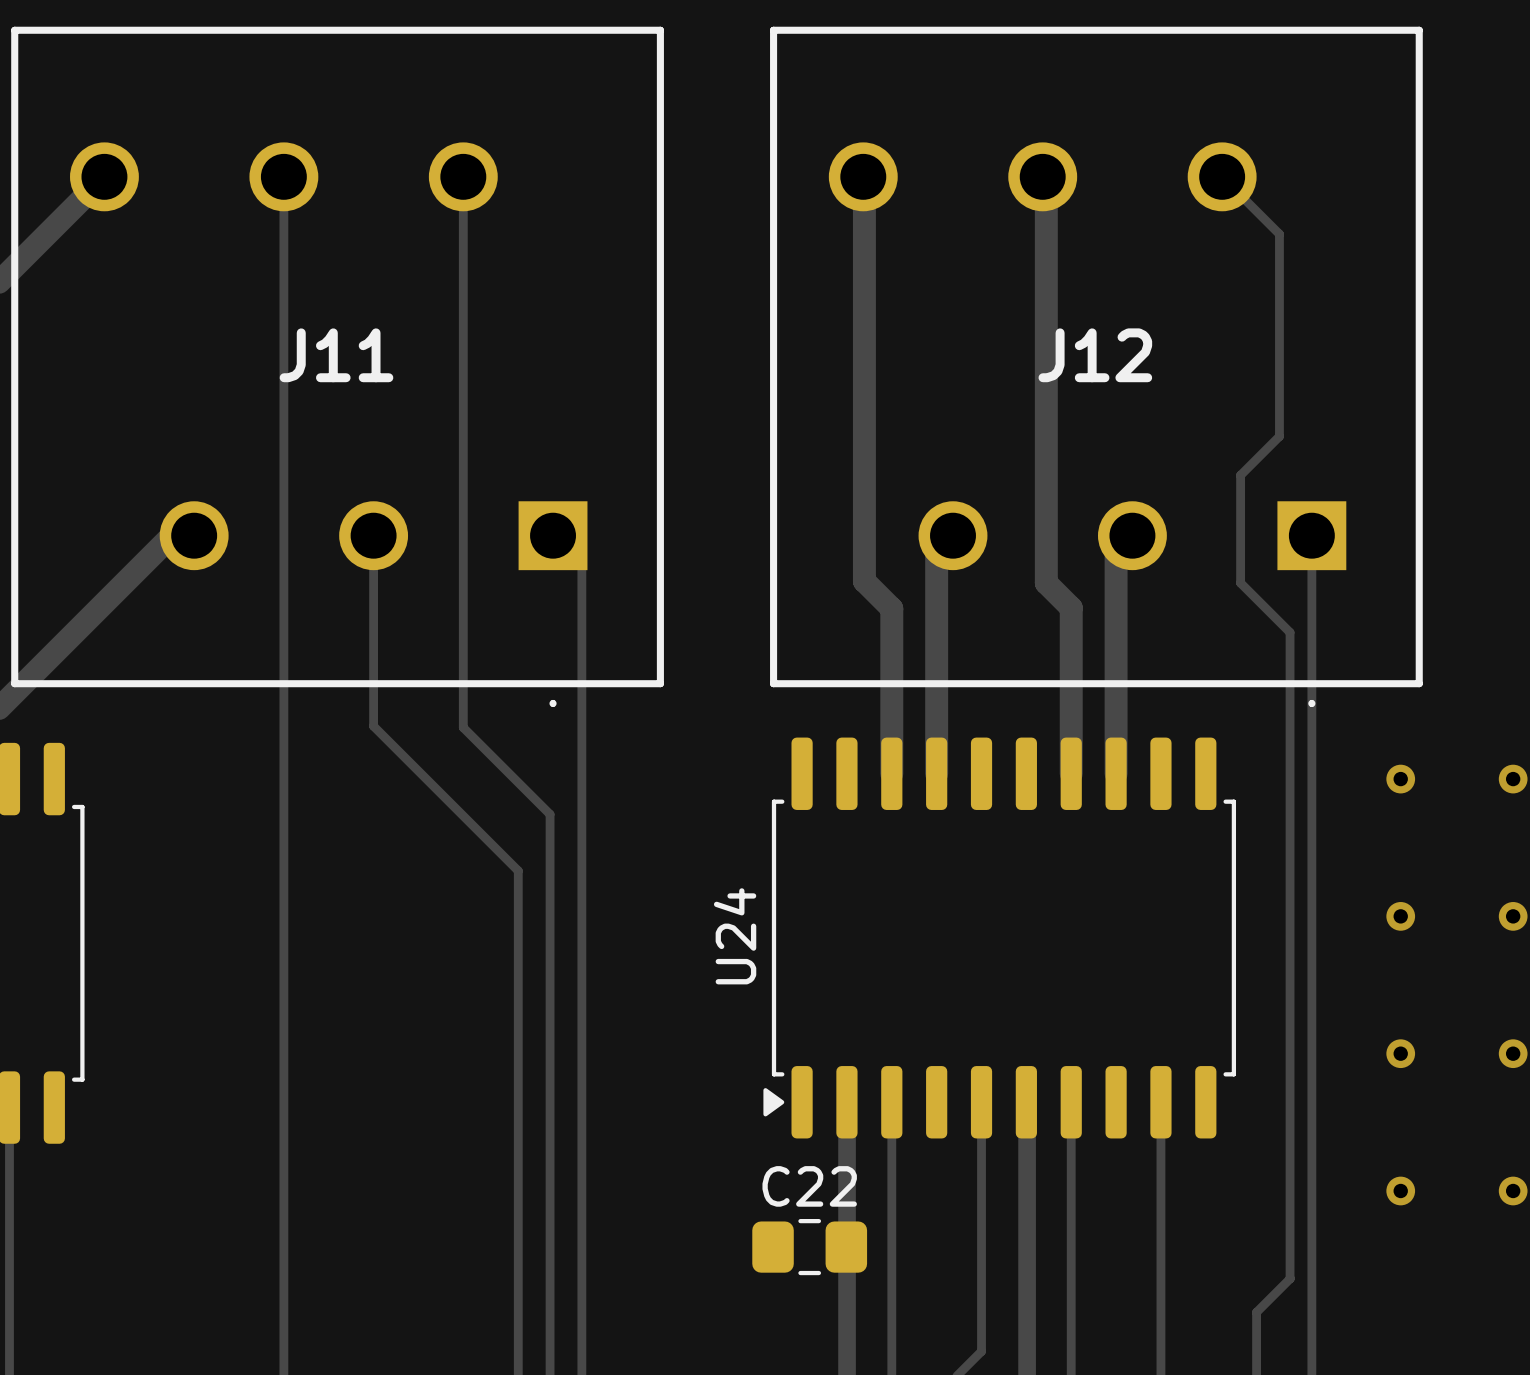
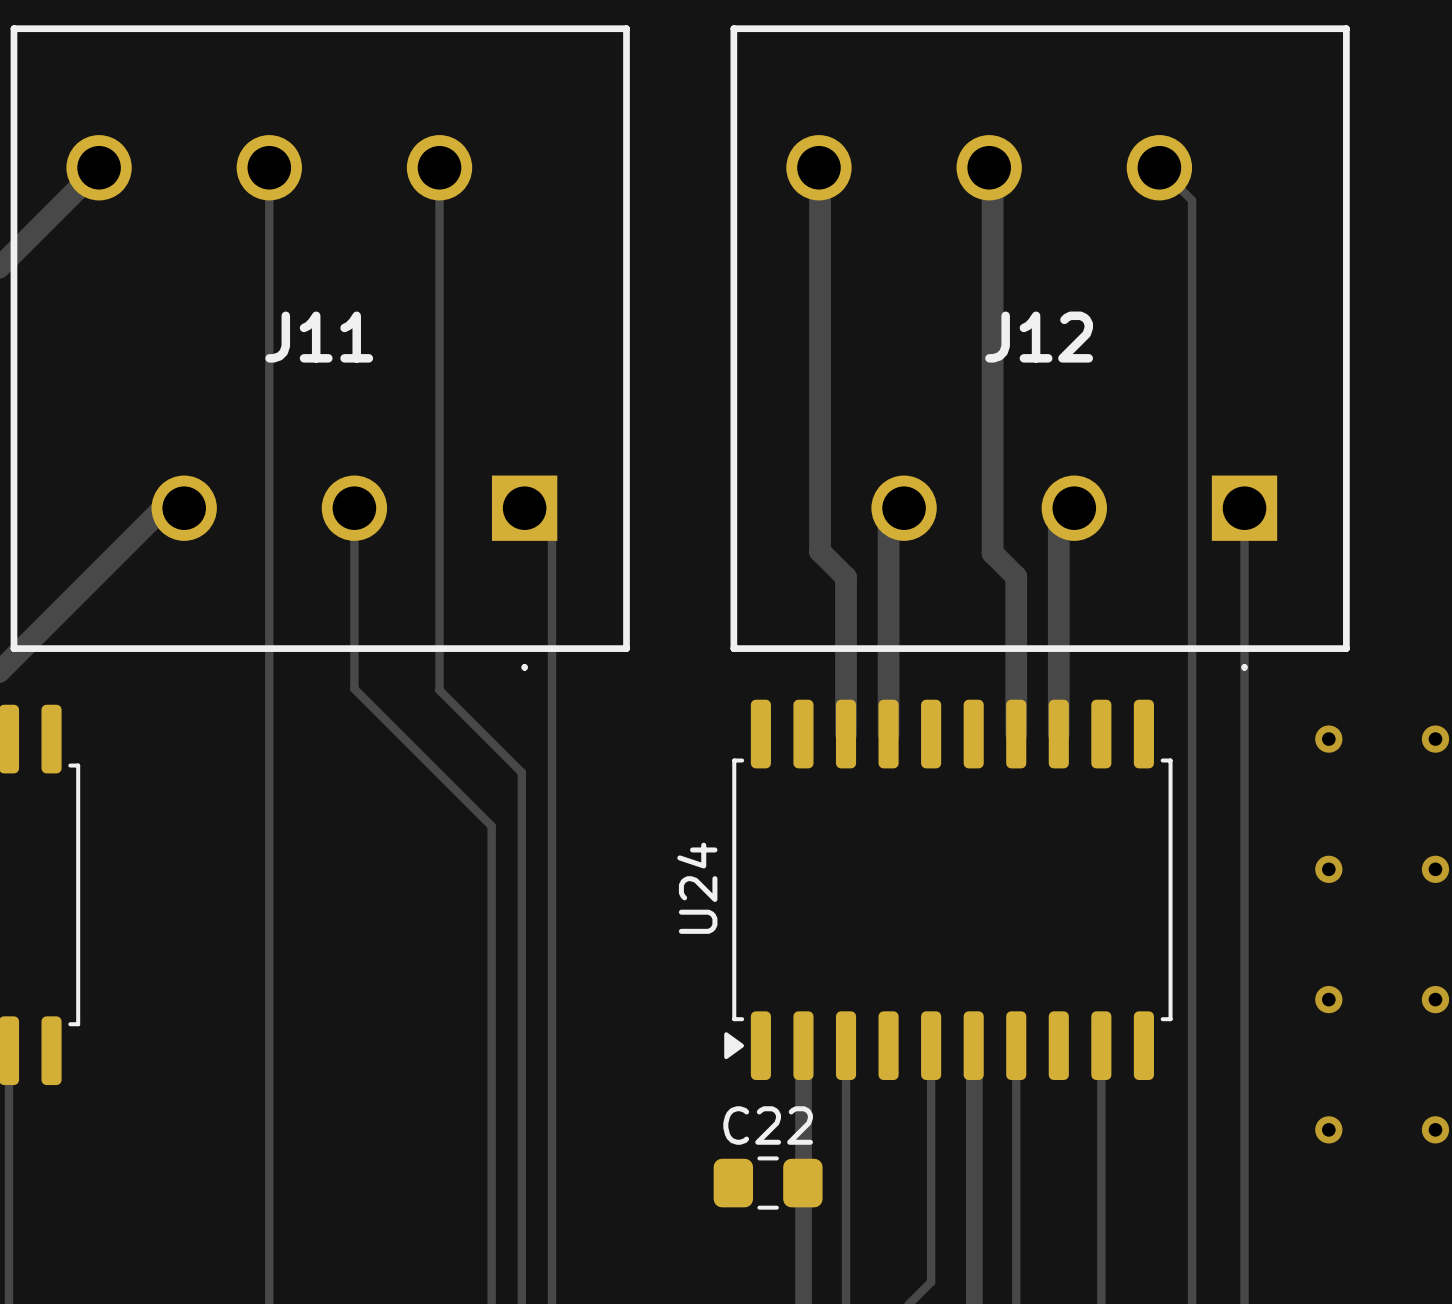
track: (1256, 211) (1279, 234) (1279, 436) (1240, 475) (1240, 583) (1290, 632) (1290, 1278) -> (1192, 200) (1192, 1244)
track: (1290, 1278) (1256, 1312) -> none

